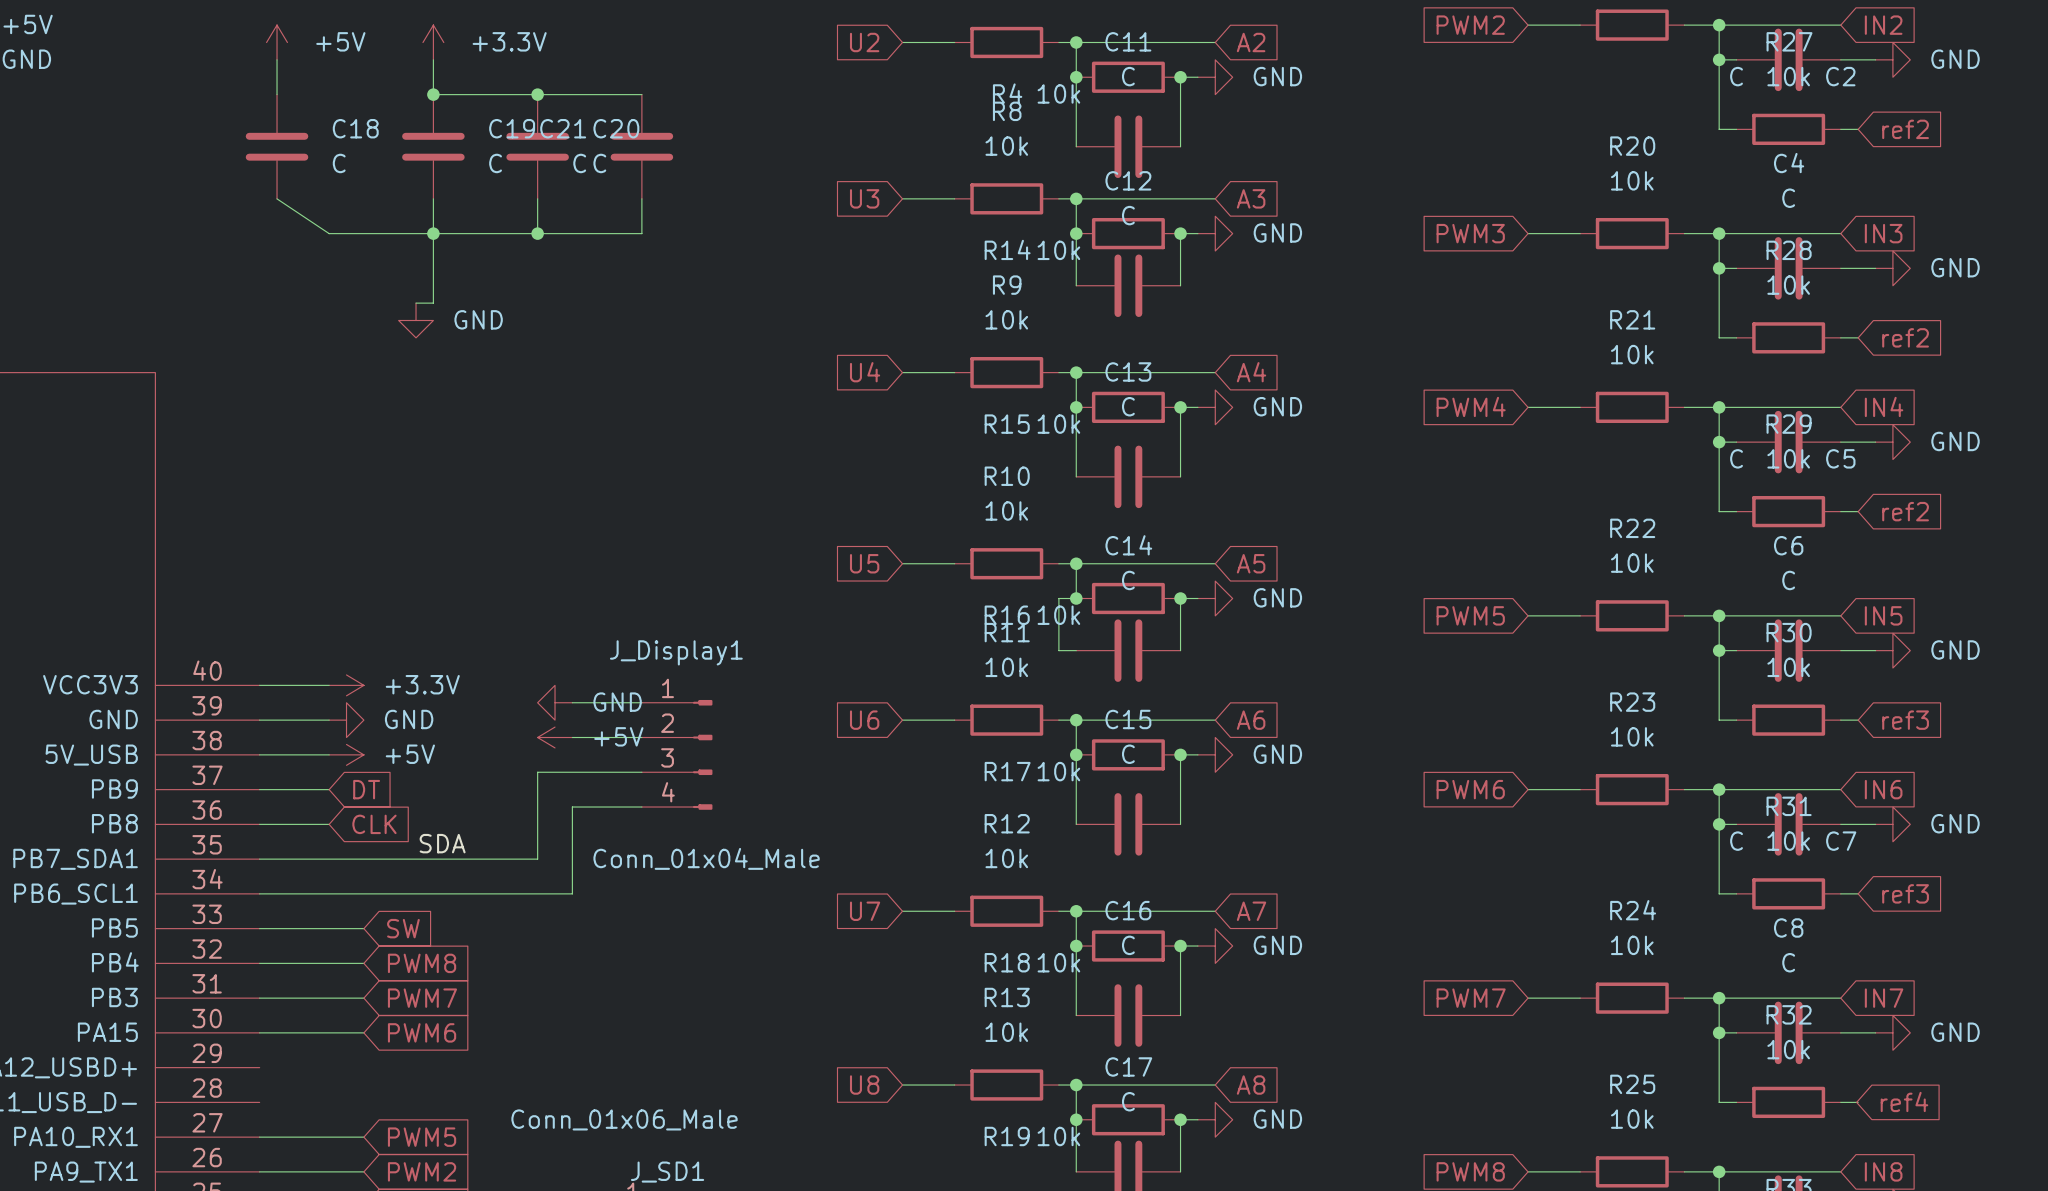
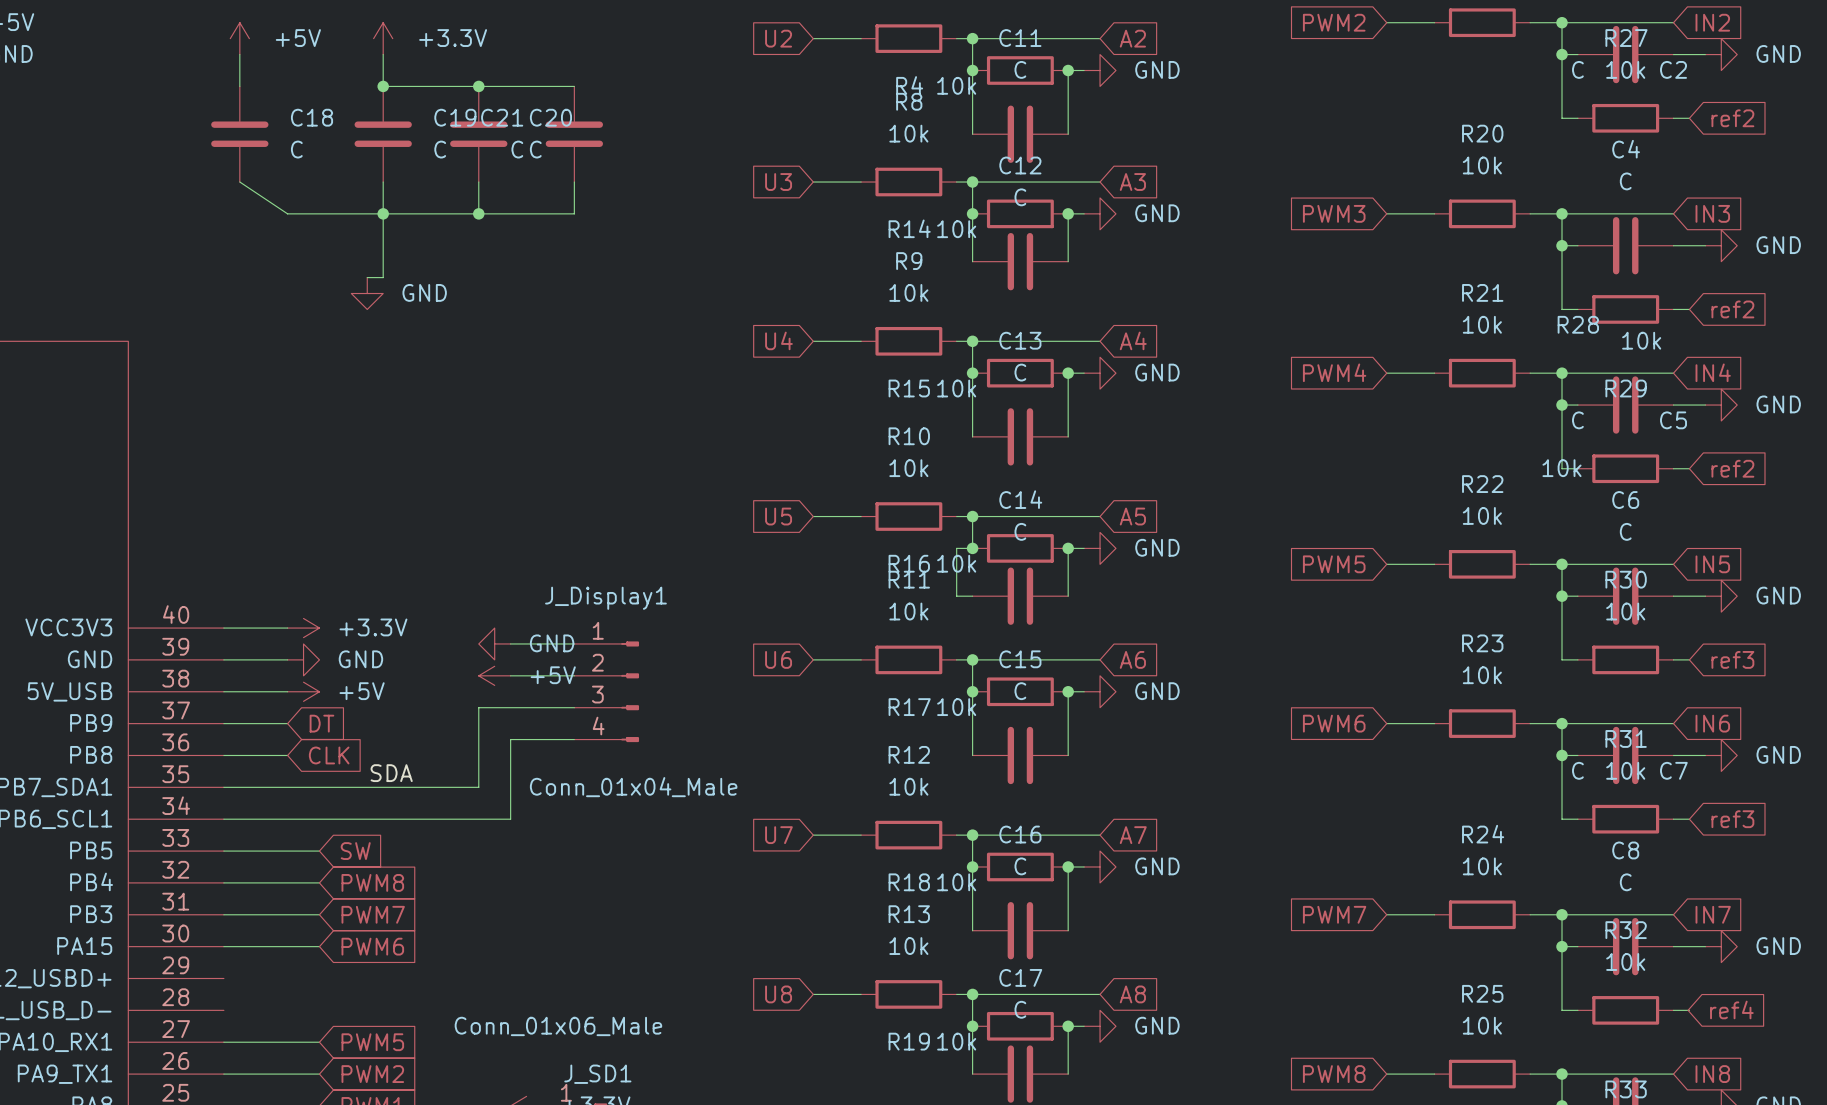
R28 name position: R28 (1789, 250) -> R28 (1578, 324)
R28 value position: 10k (1788, 285) -> 10k (1641, 340)
R29 value position: 10k (1788, 458) -> 10k (1562, 468)

